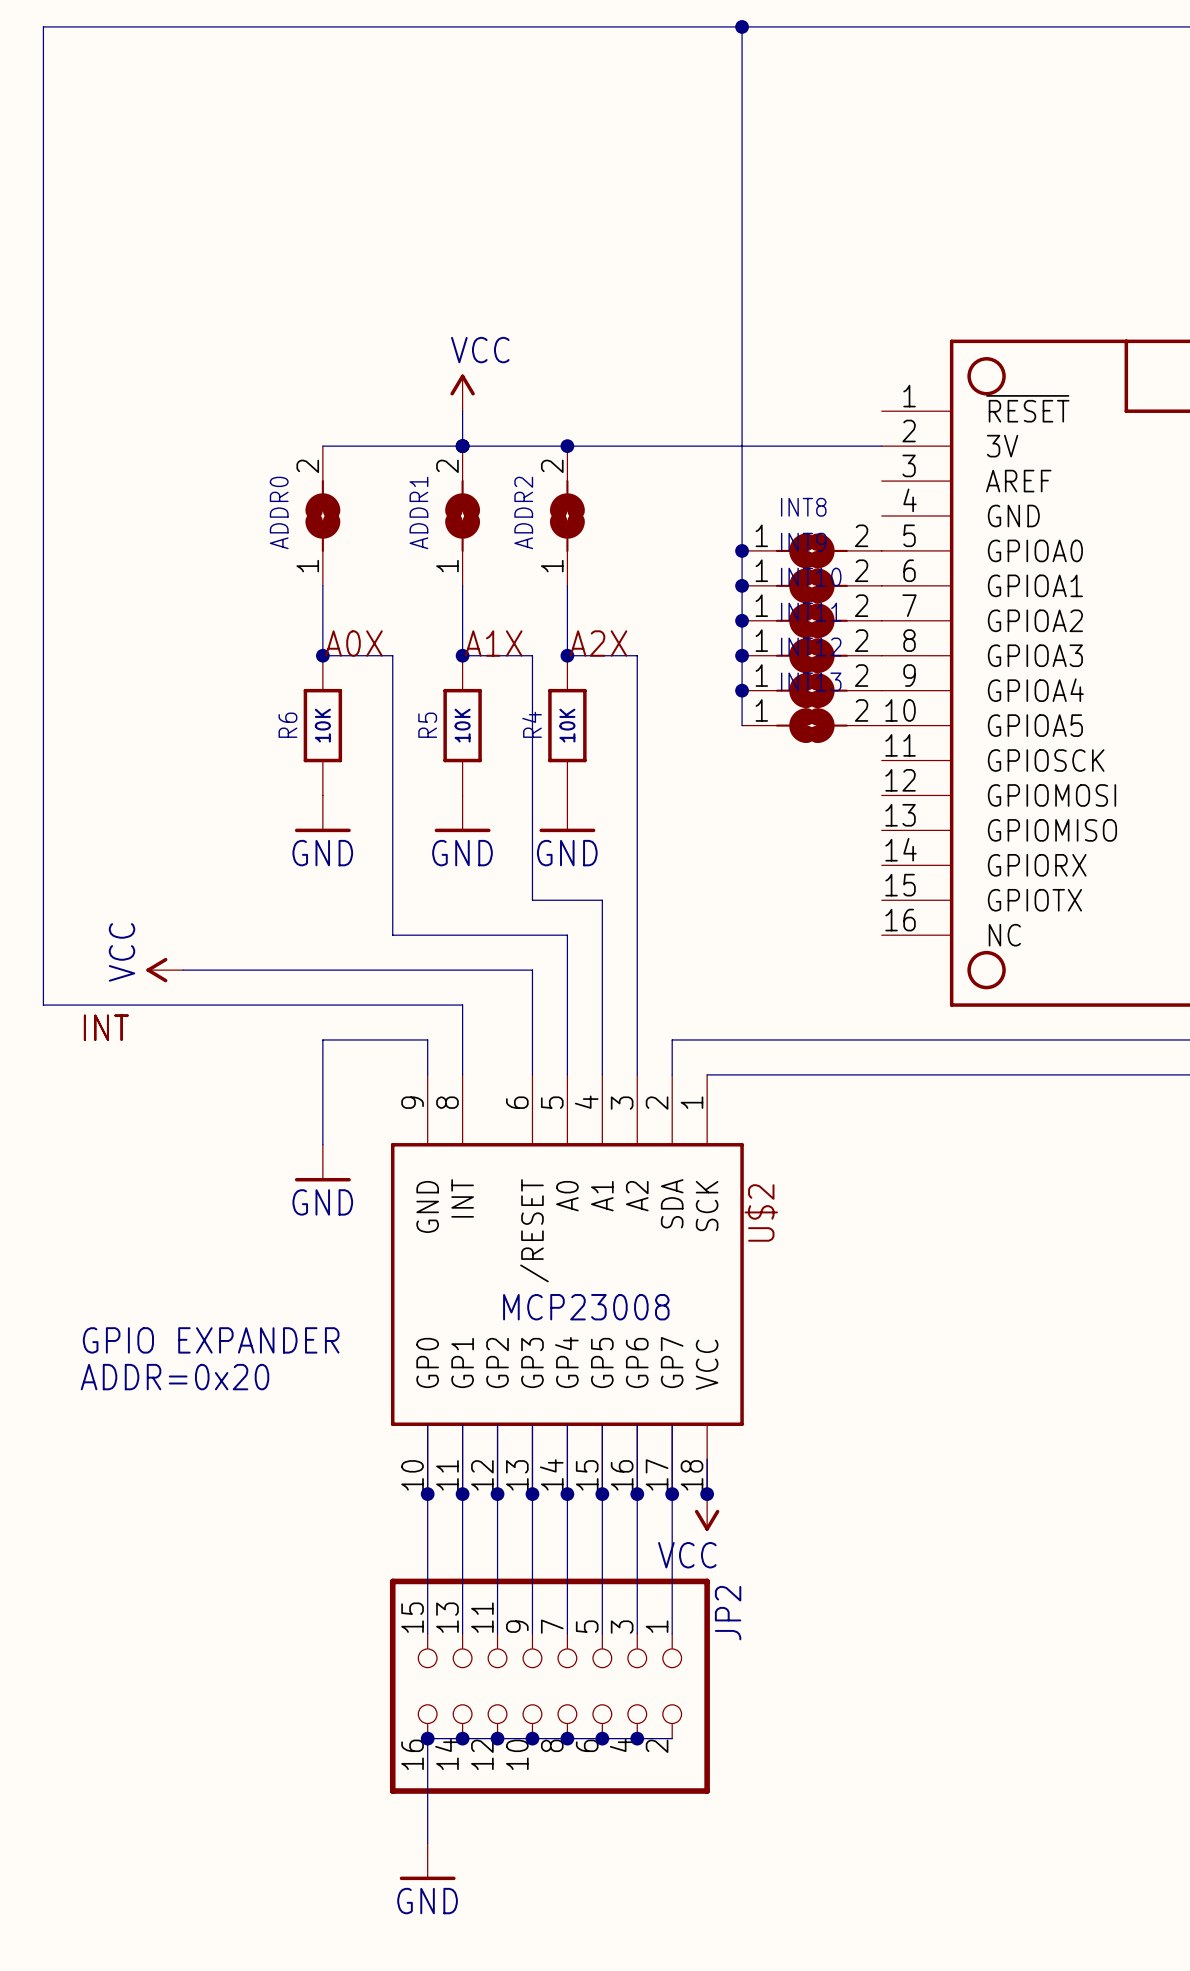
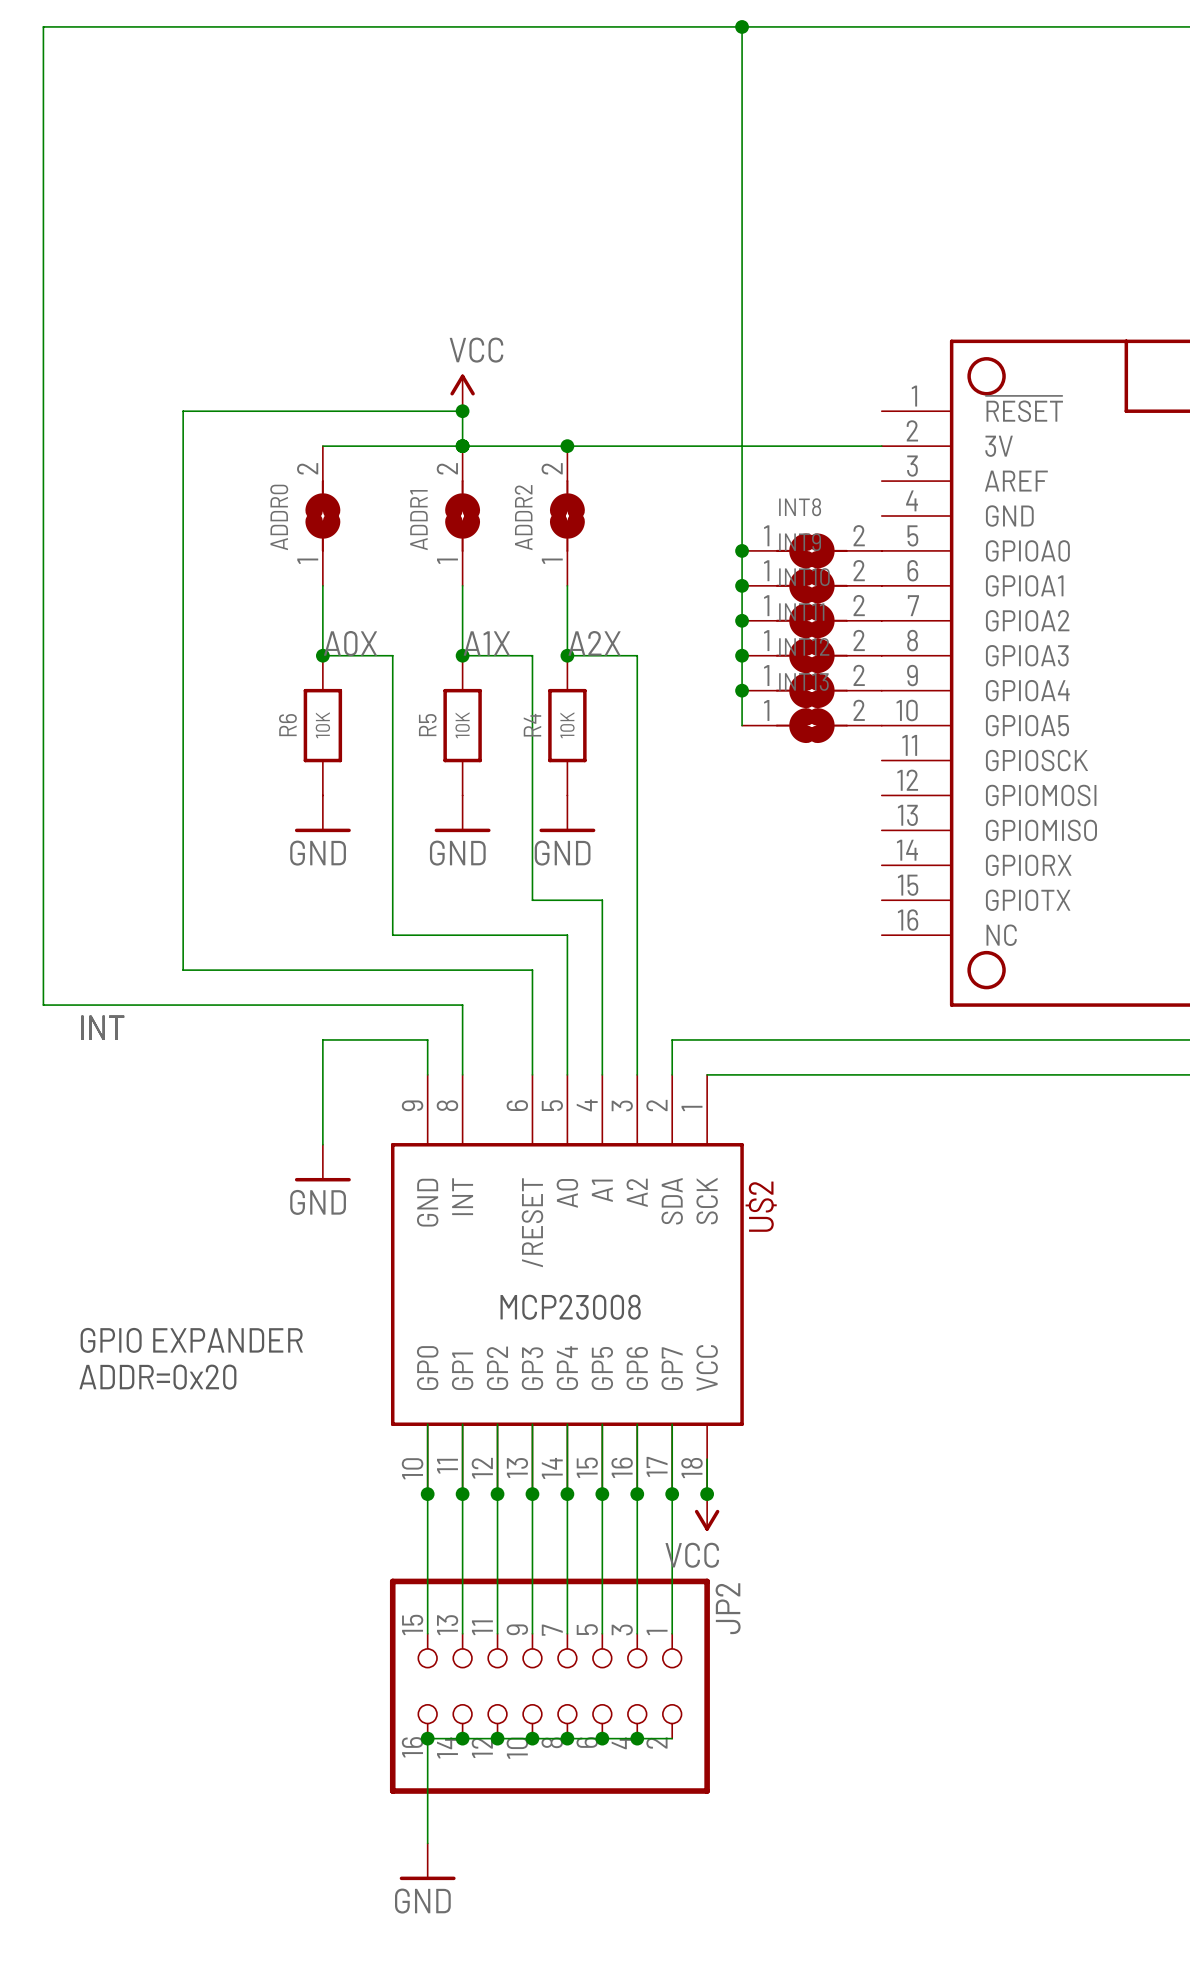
wire: none -> (462, 411) (183, 411) (183, 970)
junction: none -> (462, 411)
power symbol: VCC (164, 970) -> none

